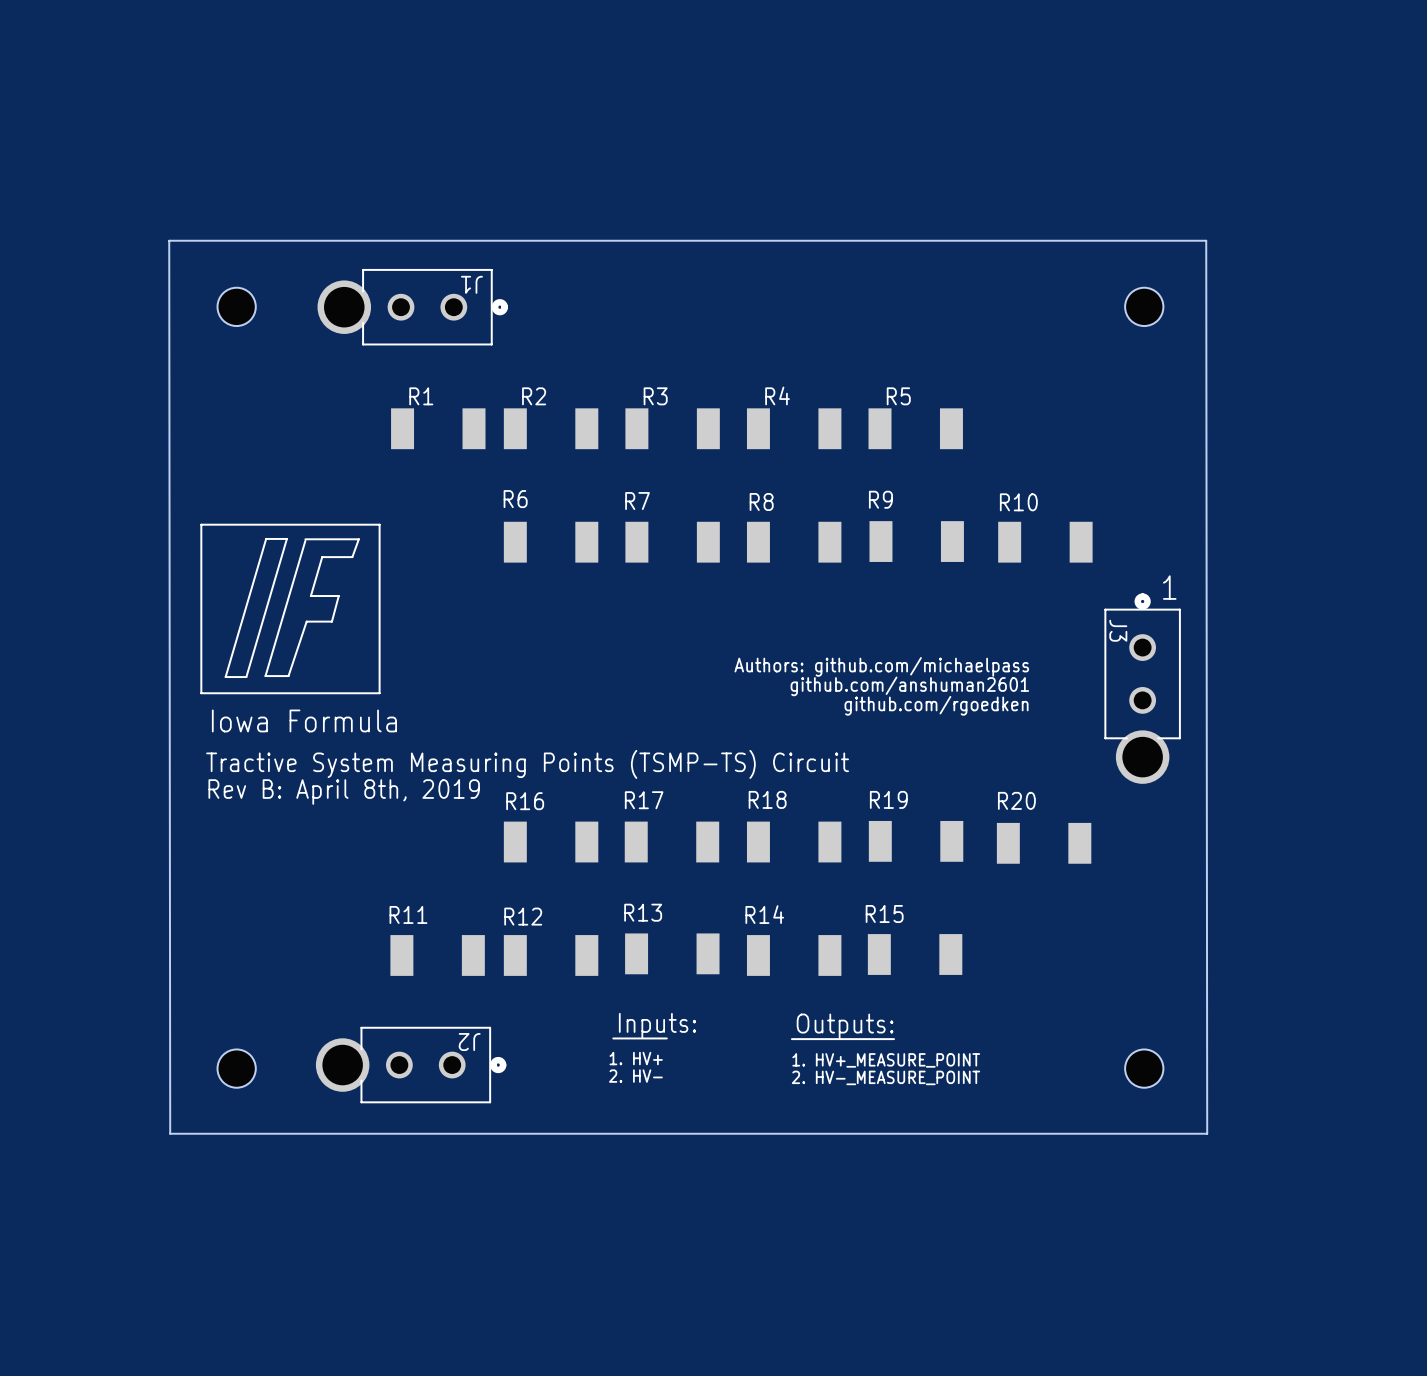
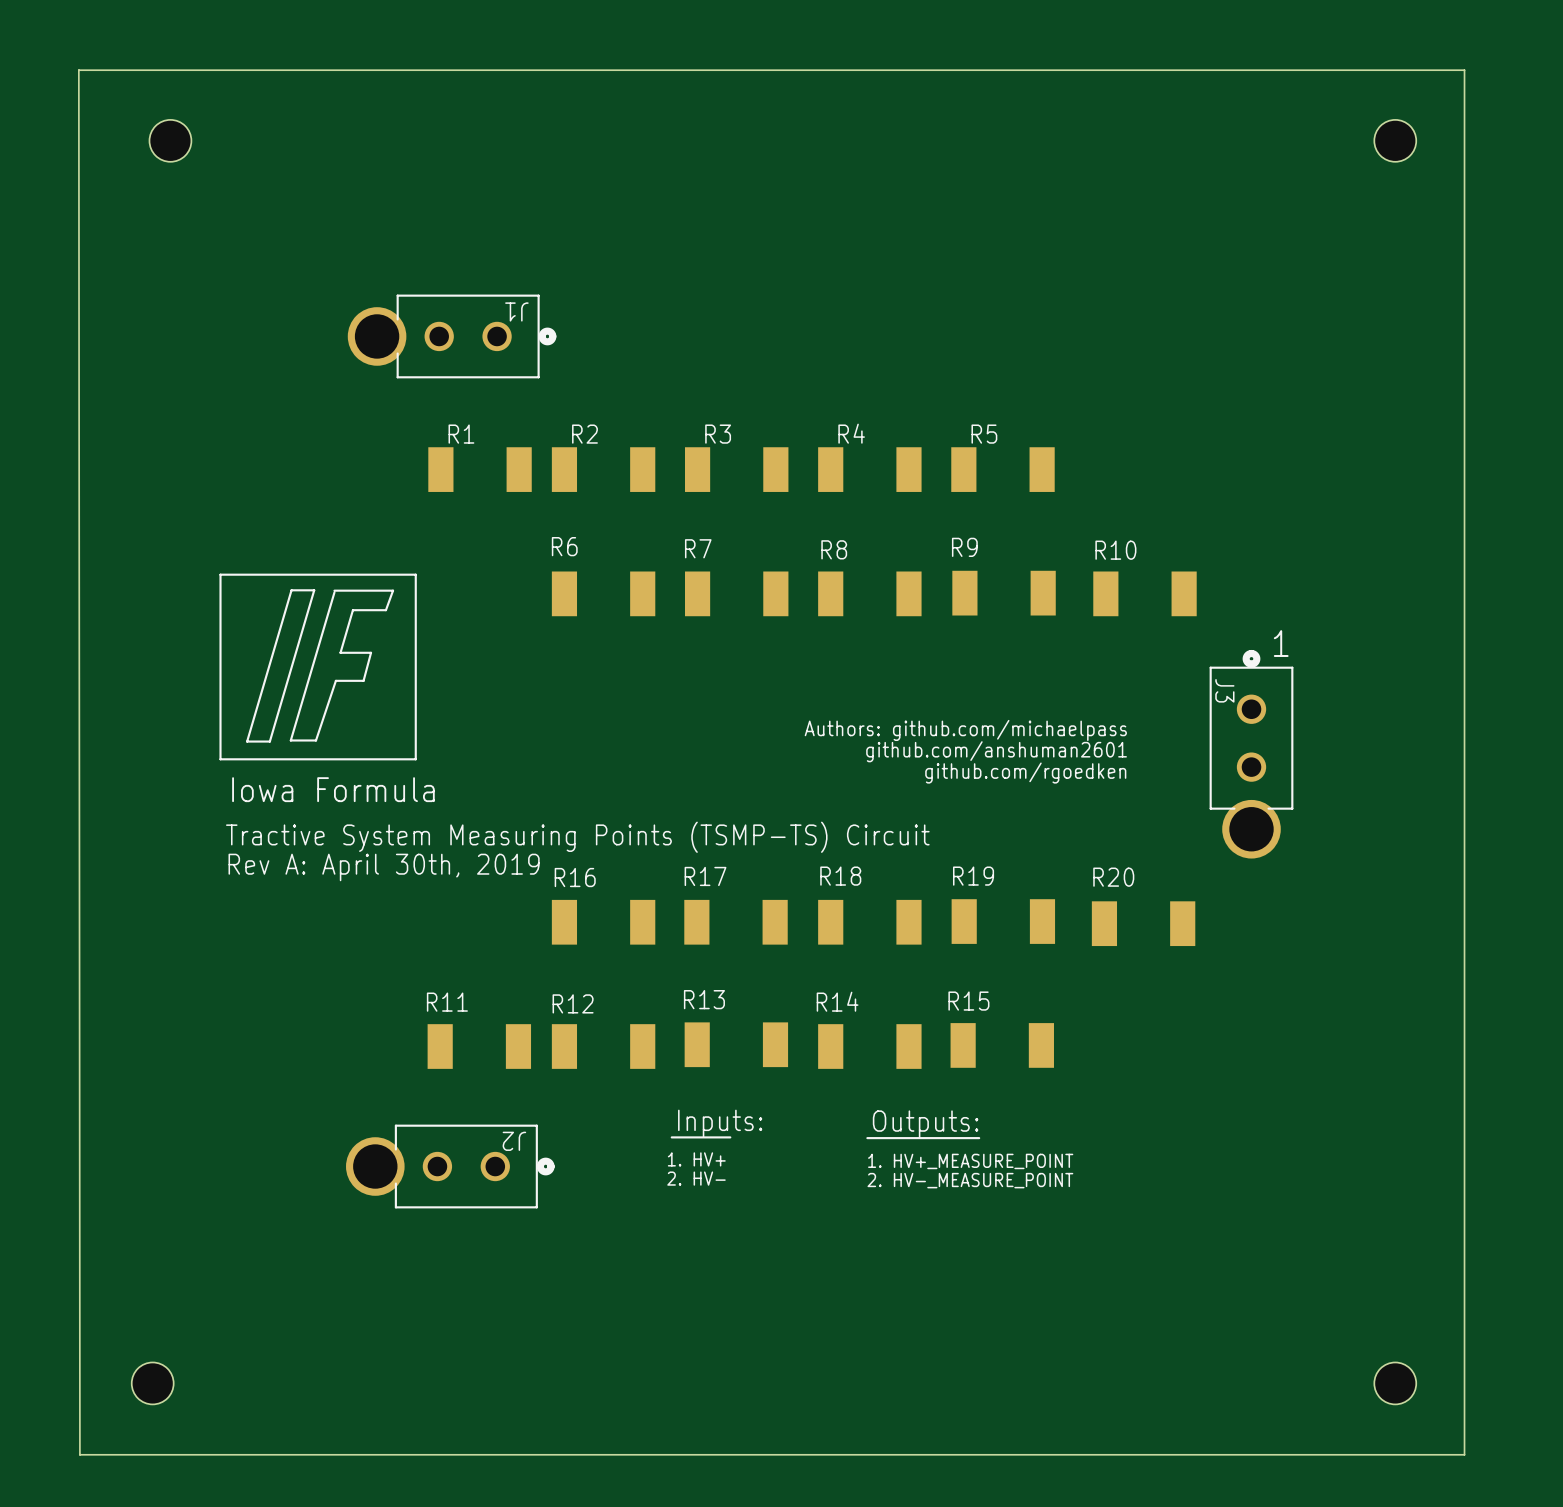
board edge: (169, 240) (1206, 240) (1207, 1133) (170, 1133) (169, 240) -> (78, 70) (79, 1454) (1464, 1454) (1464, 70) (78, 70)
hole position: (236, 306) -> (170, 140)
hole position: (1144, 306) -> (1395, 140)
text: Rev B: April 8th, 2019 (344, 792) -> Rev A: April 30th, 2019 (384, 867)
hole position: (236, 1068) -> (152, 1383)
hole position: (1144, 1068) -> (1395, 1383)

